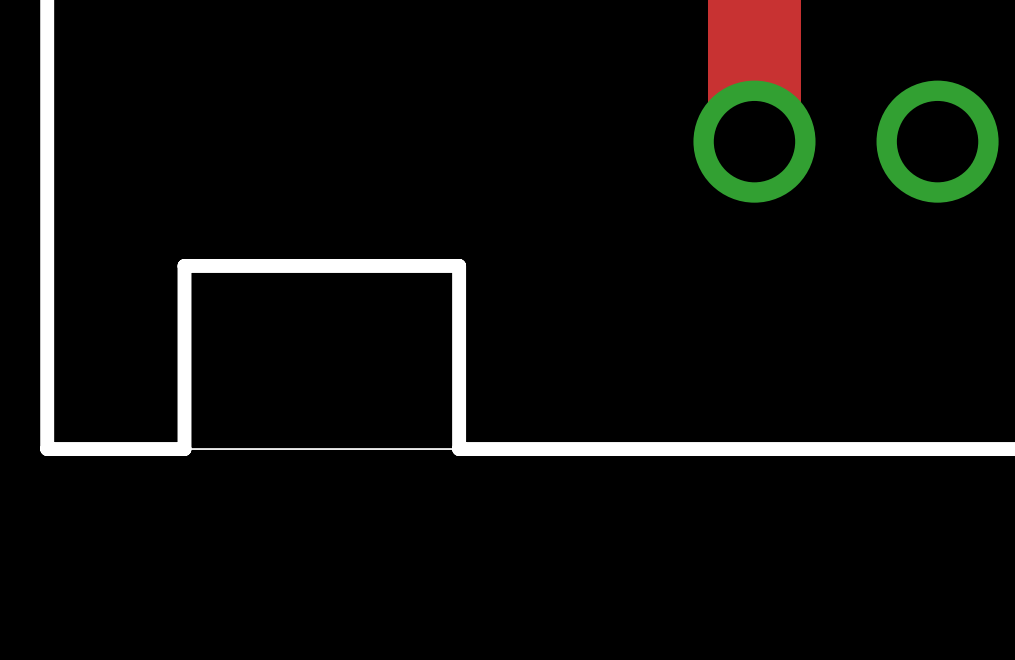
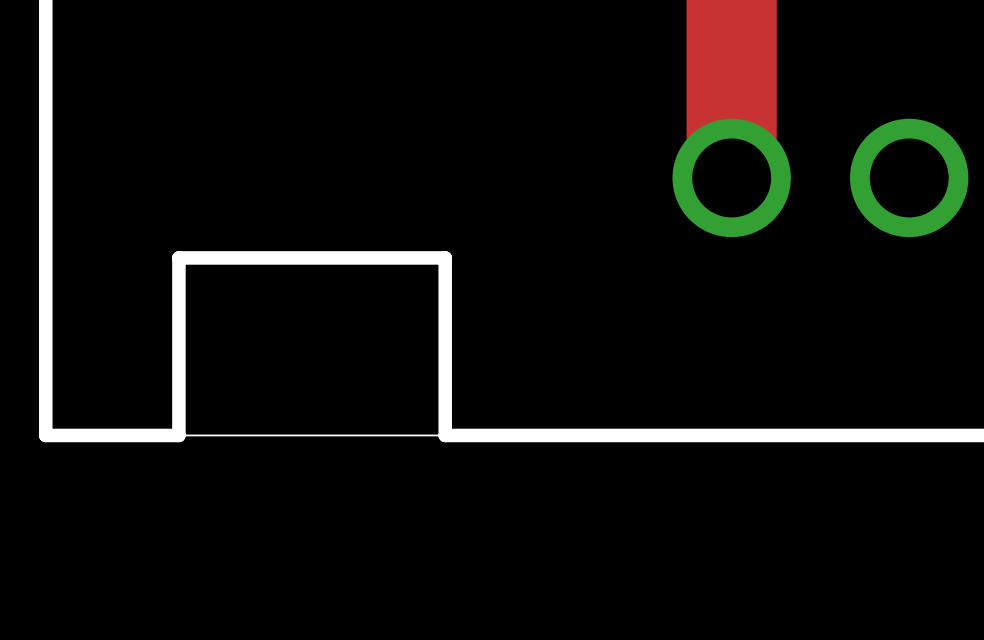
part position: (846, 141) -> (820, 177)

